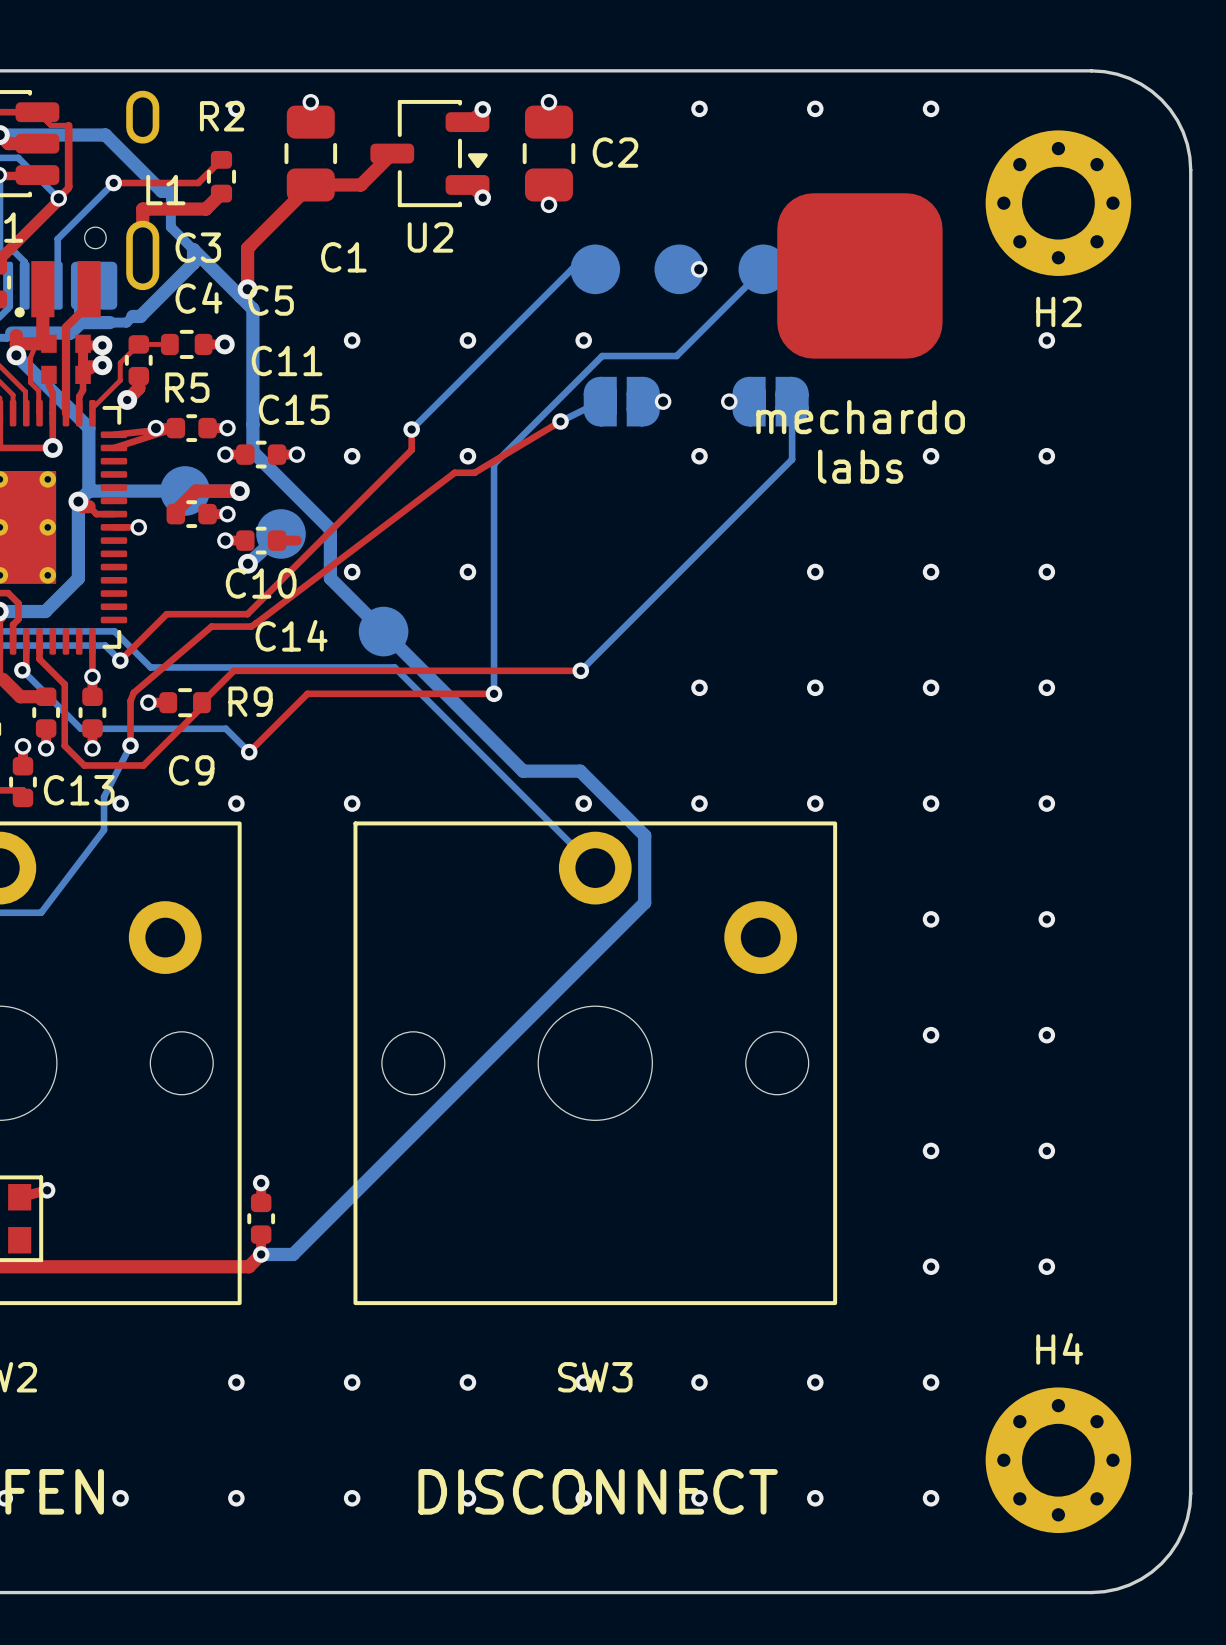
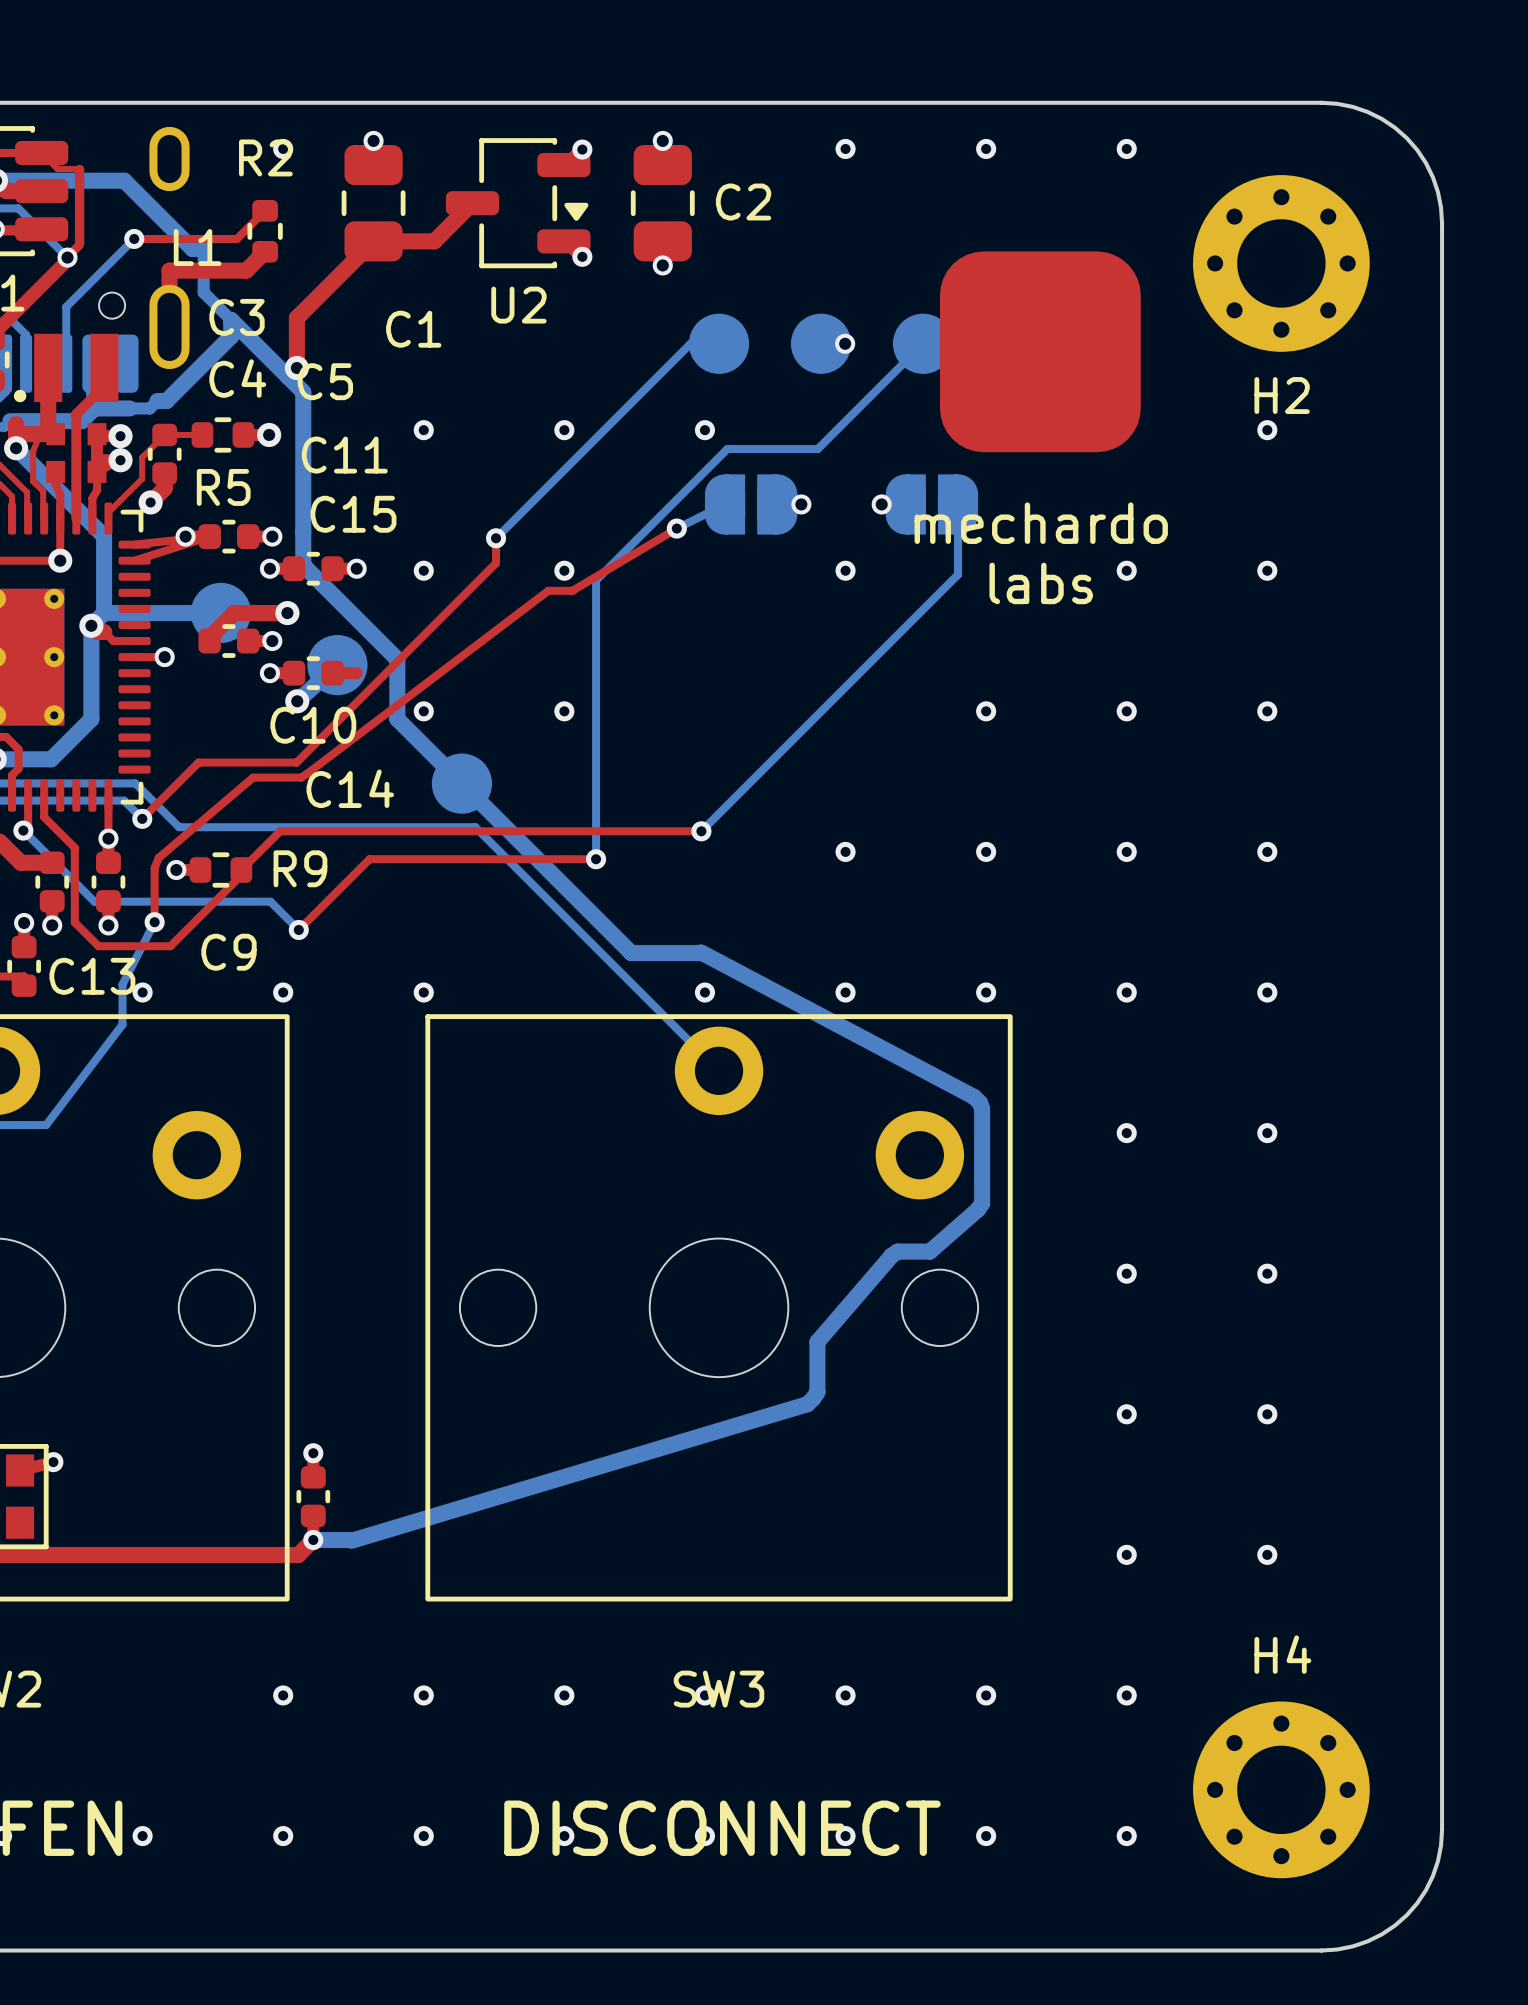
bottom track: (580, 771) (644, 835) (644, 902) (293, 1254) -> (700, 952) (974, 1096) (980, 1102) (982, 1109) (982, 1203) (978, 1209) (929, 1251) (897, 1251) (891, 1255) (817, 1341) (817, 1392) (807, 1404) (351, 1540)

